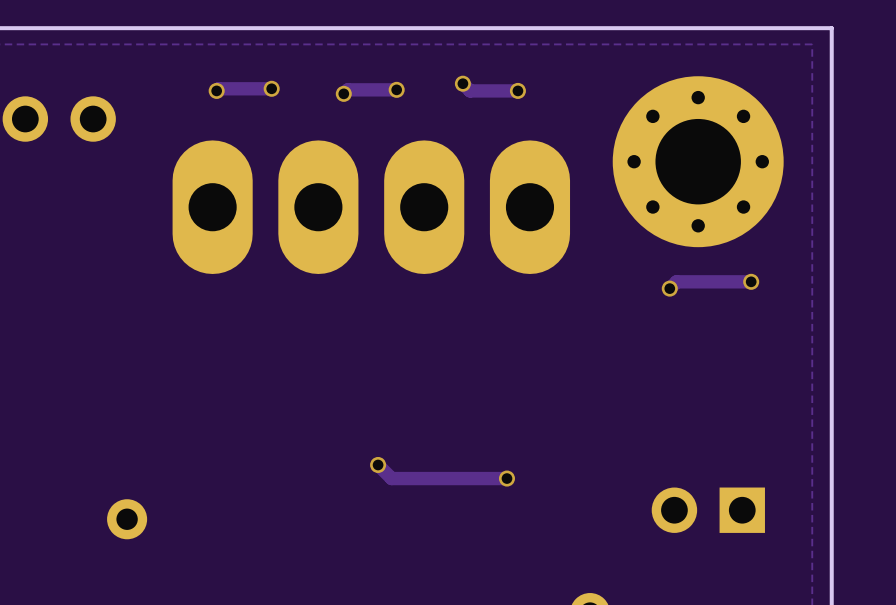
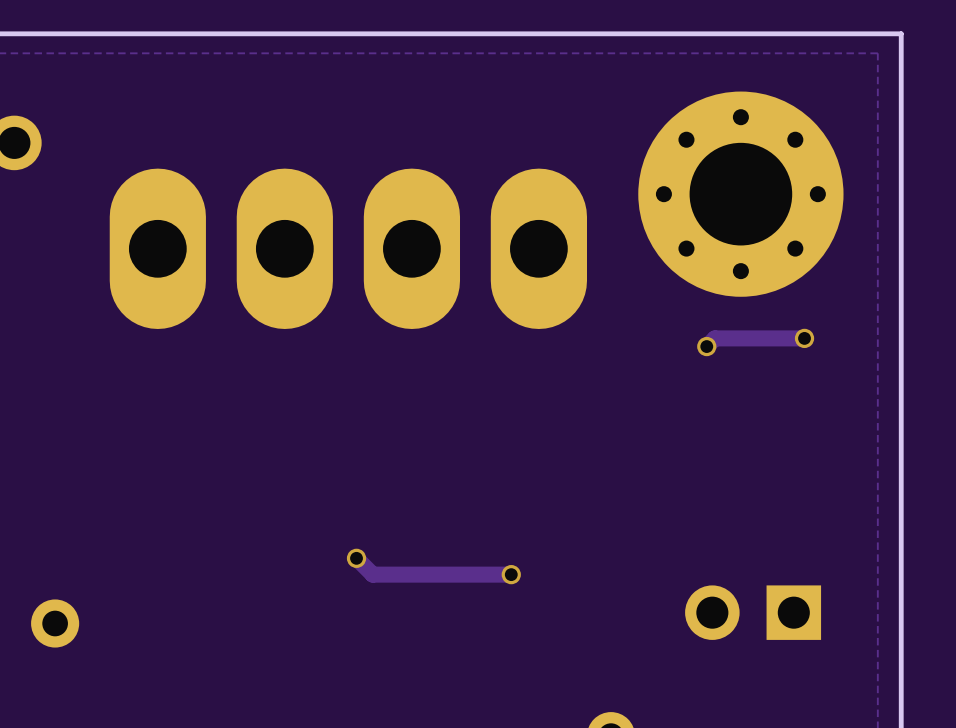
track: (462, 83) (470, 90) (517, 90) -> none
via: (462, 83) -> none
track: (271, 88) (218, 88) (216, 90) -> none
via: (271, 88) -> none
track: (396, 89) (347, 89) (343, 93) -> none
via: (396, 89) -> none
via: (216, 90) -> none
via: (517, 90) -> none
via: (343, 93) -> none

